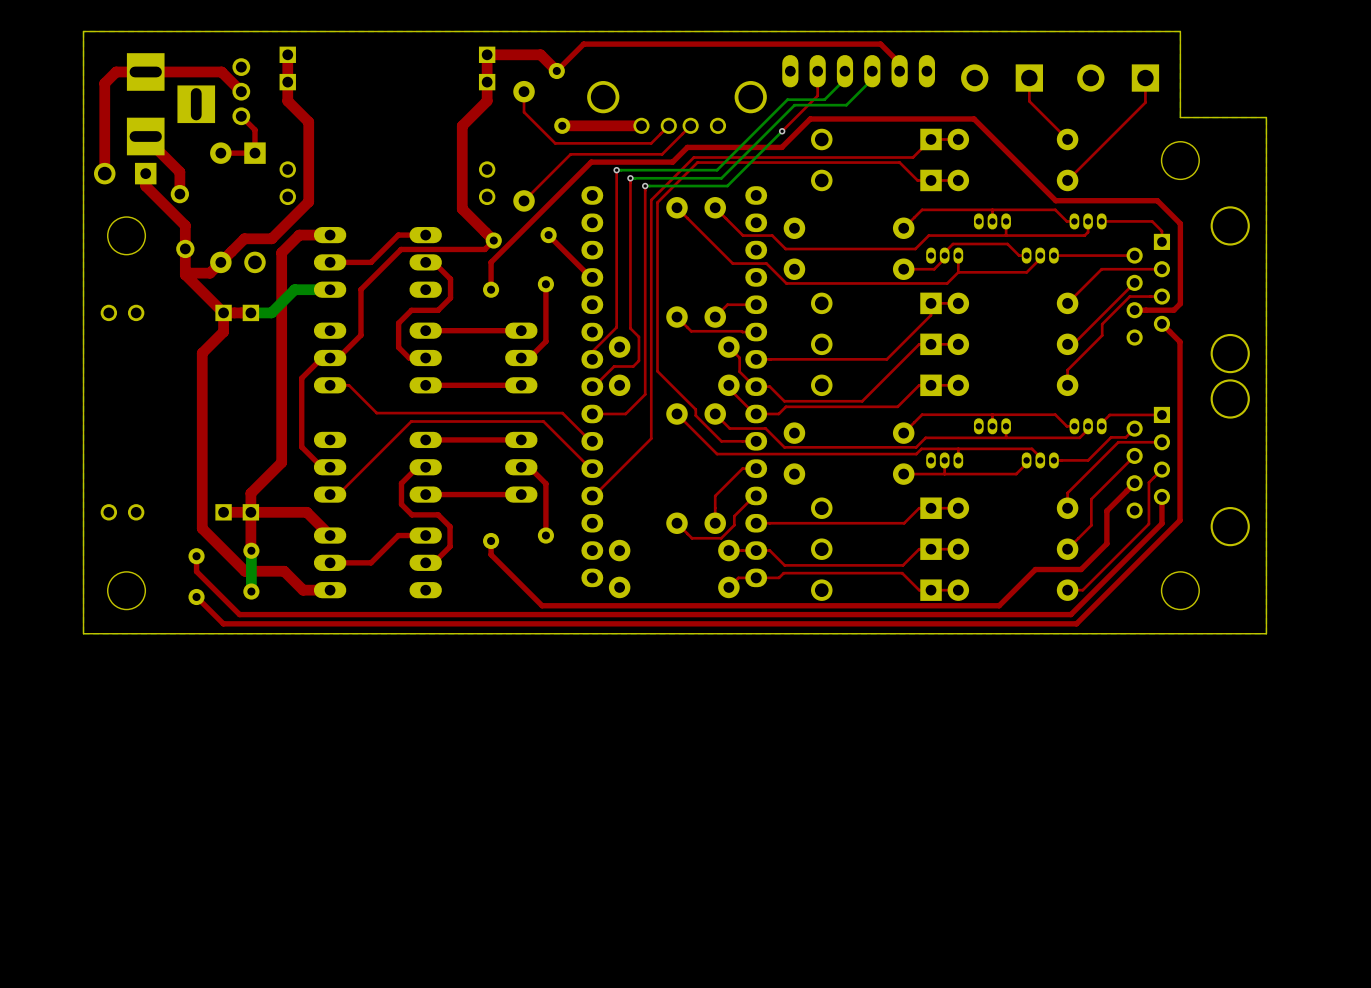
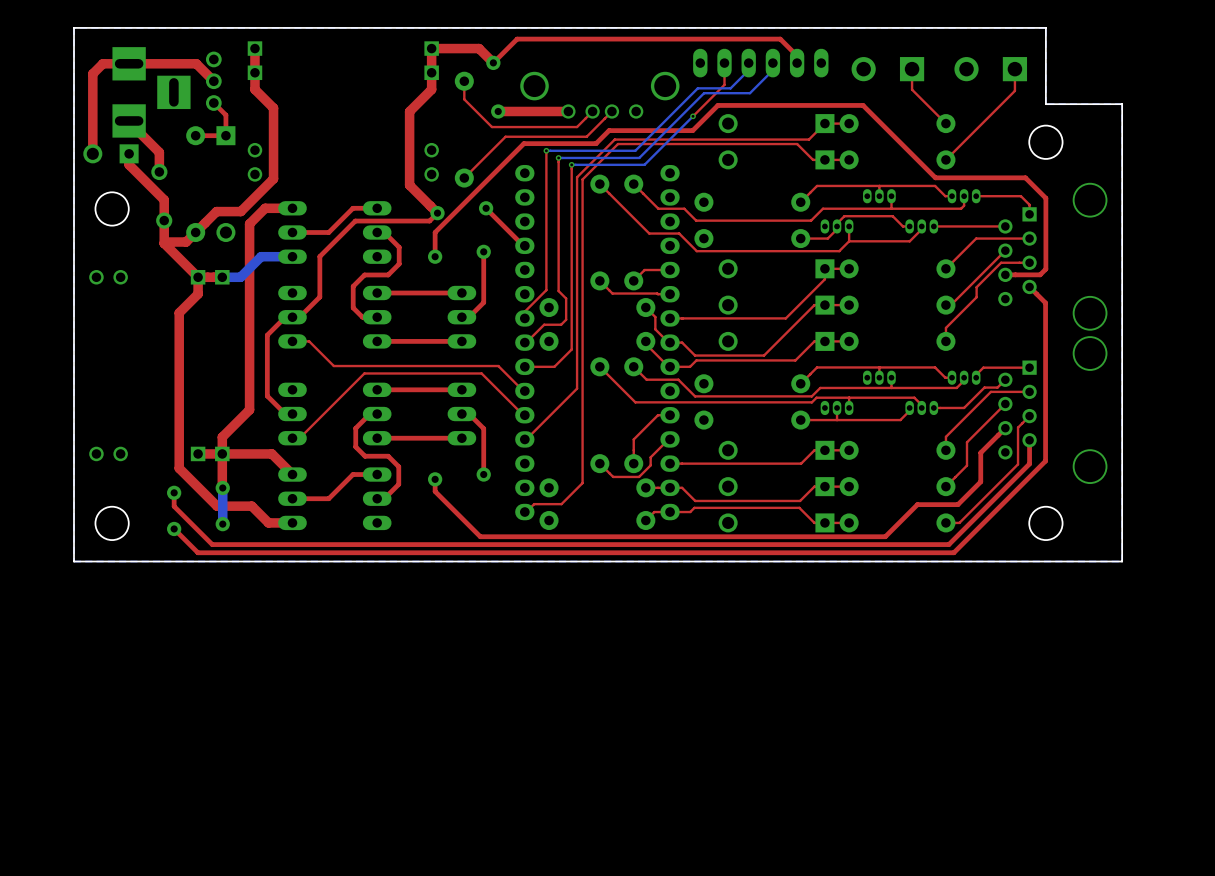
top track: (657, 371) (695, 409) (695, 415) (721, 441) (756, 441) -> (582, 328) (582, 483) (561, 504) (534, 504) (524, 512)

